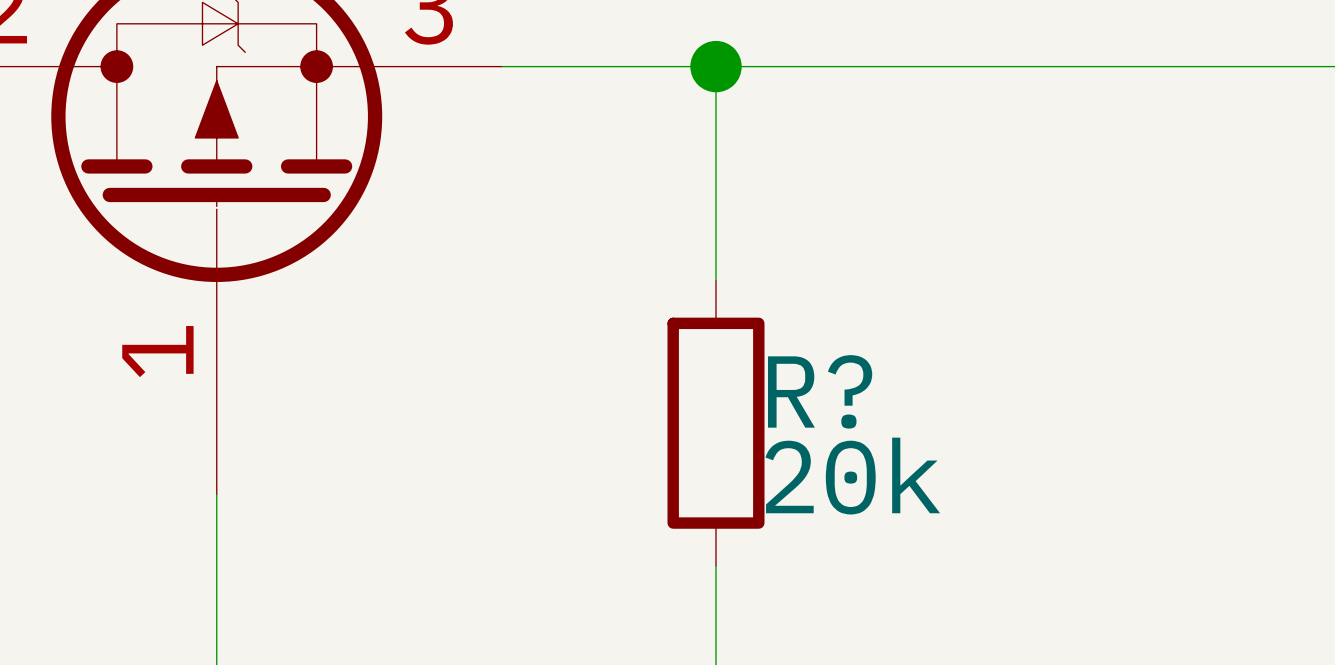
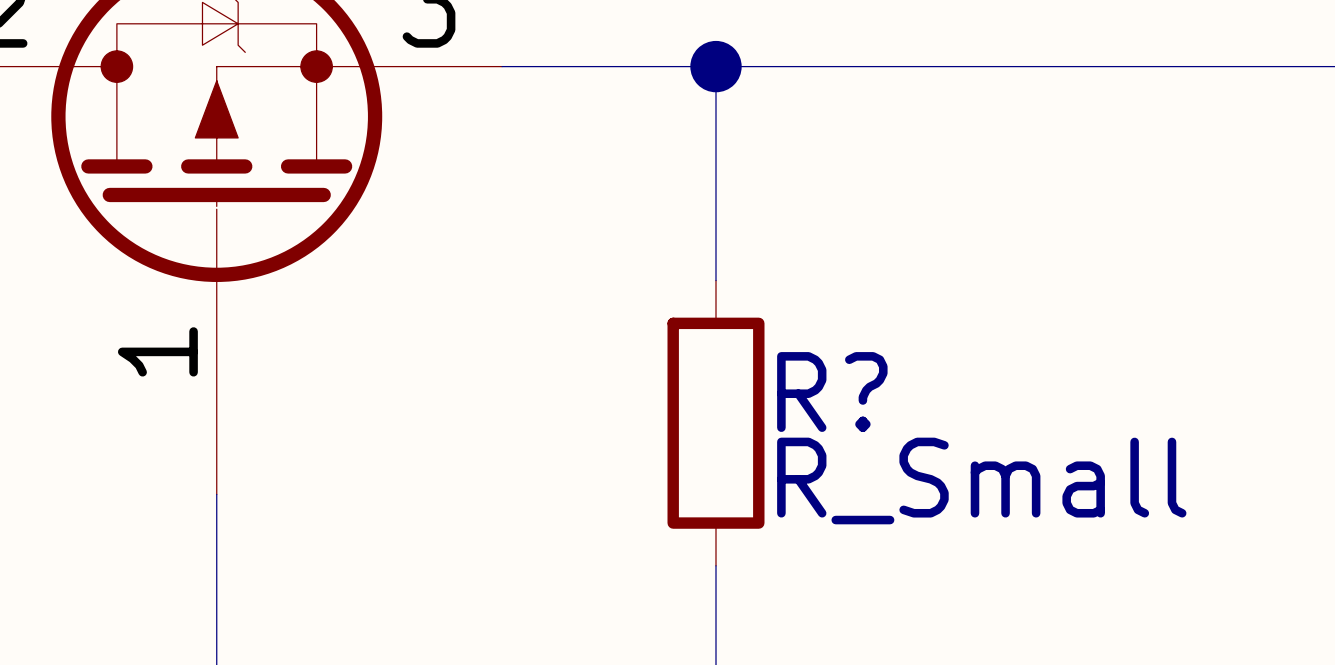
R? value: 20k (852, 476) -> R_Small (981, 480)

